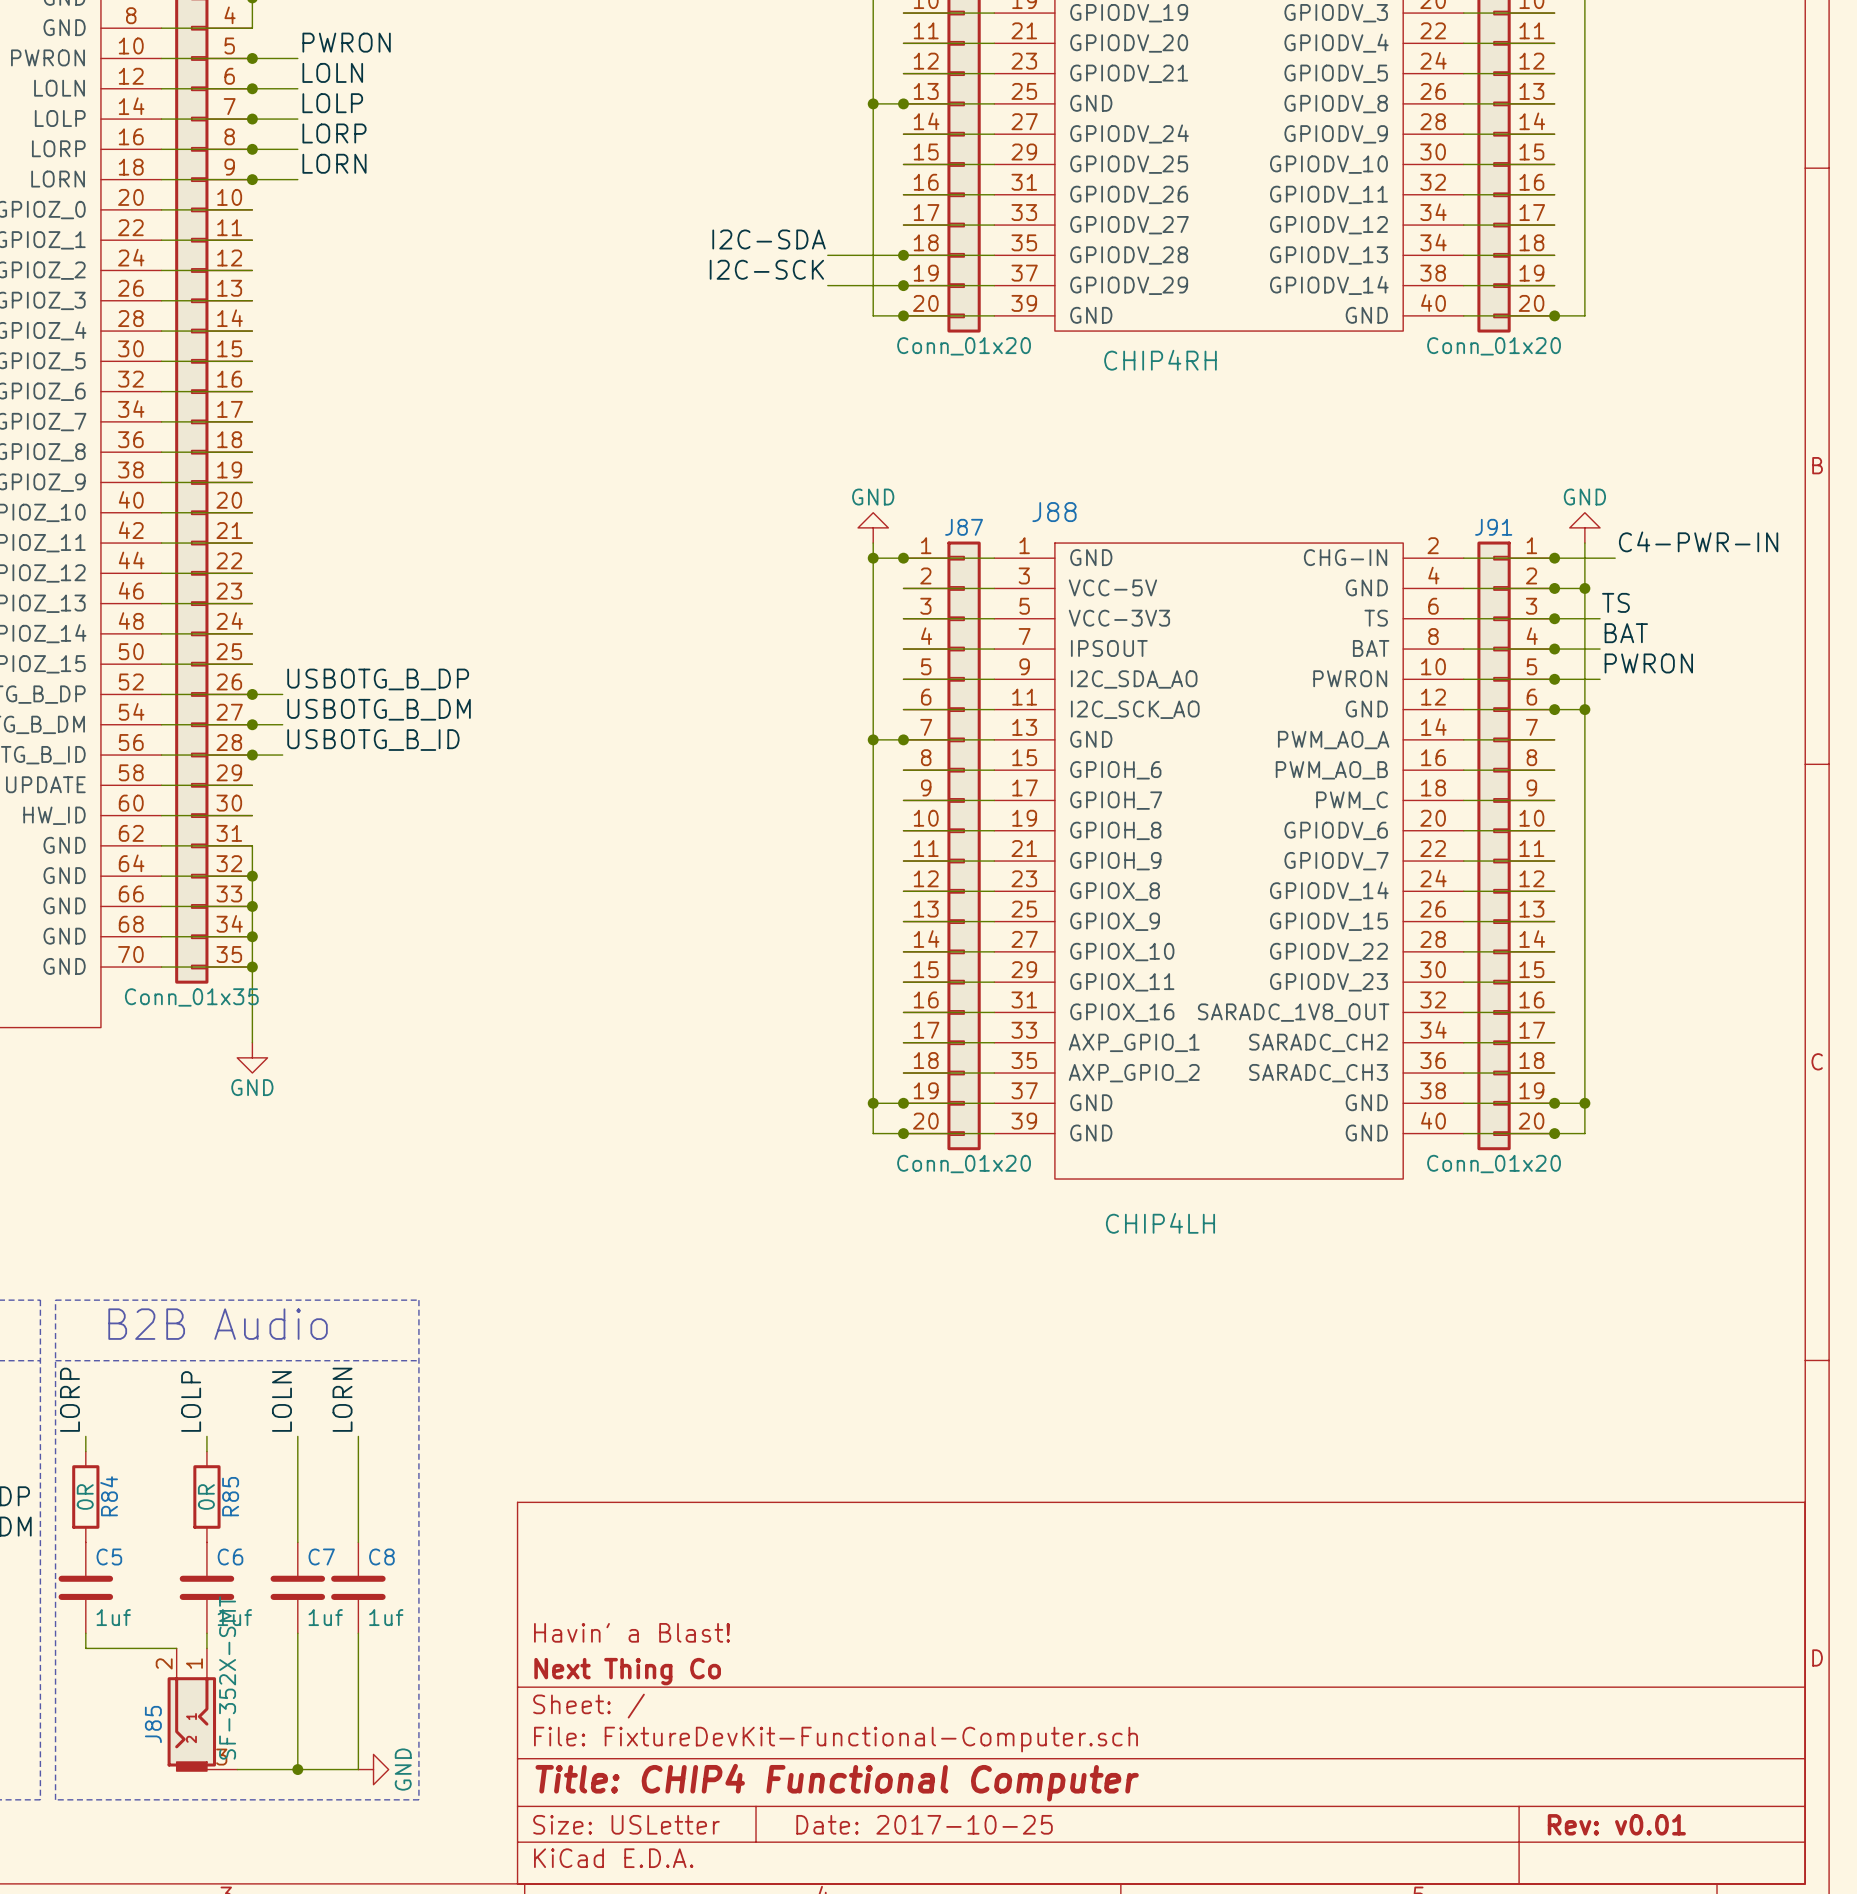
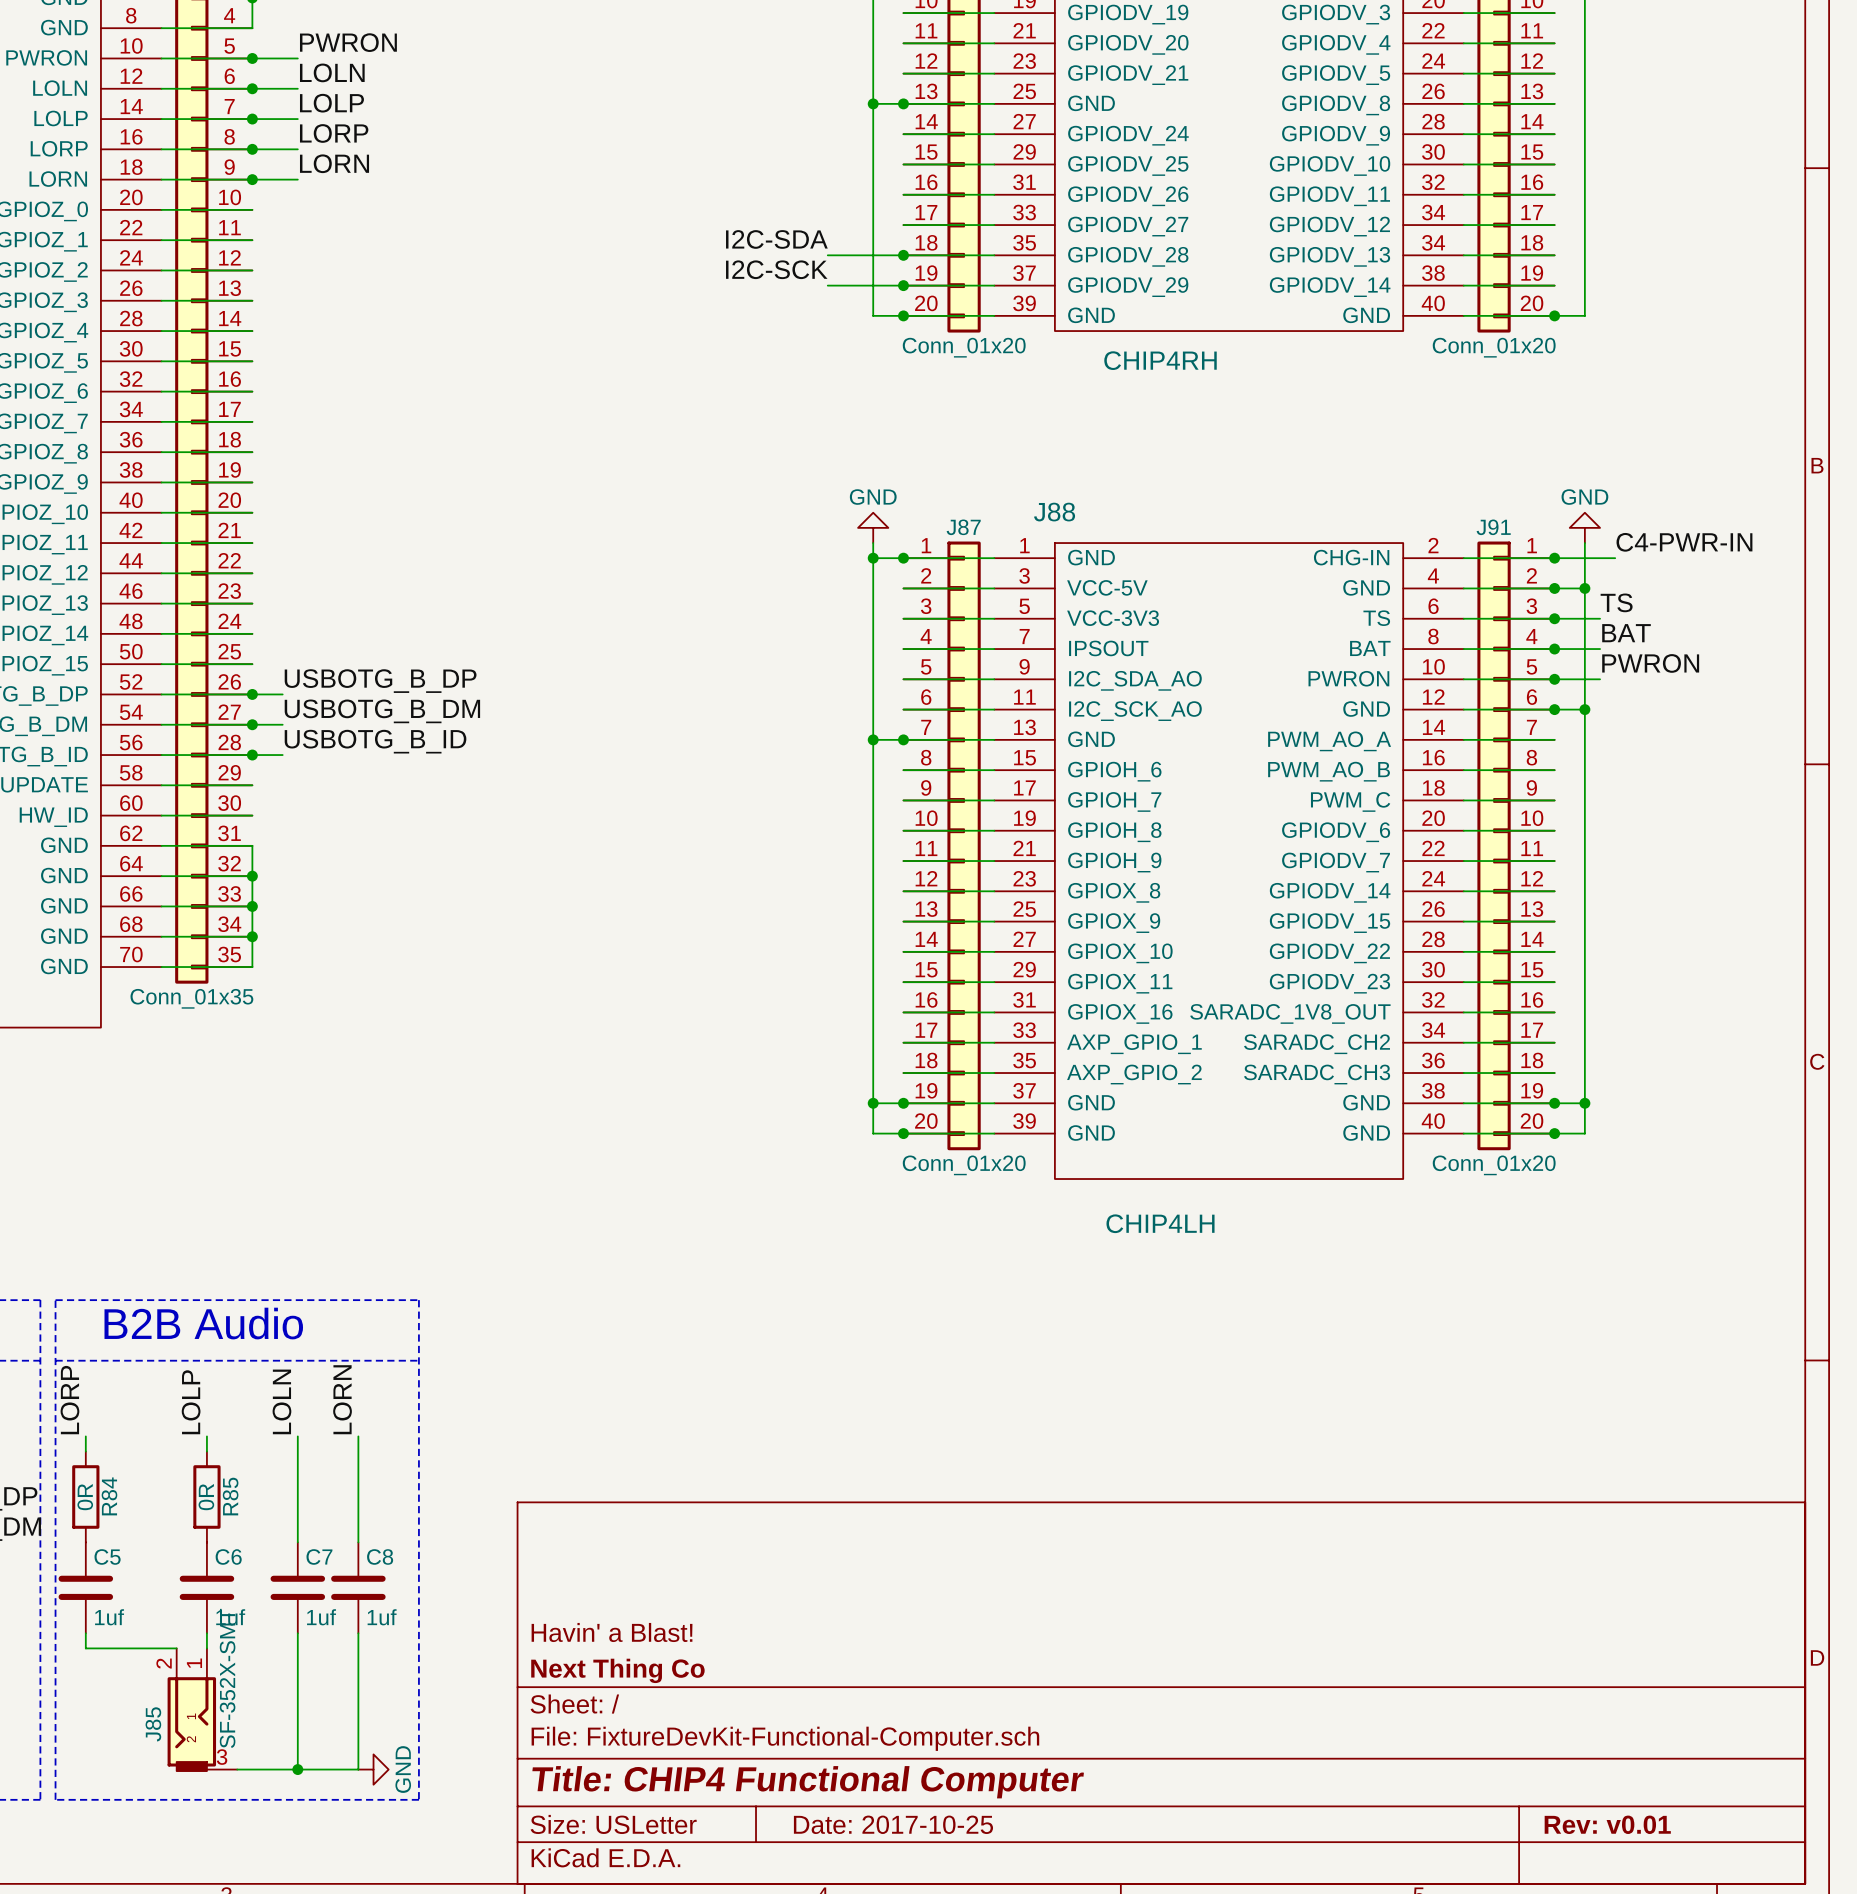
wire: (252, 967) (252, 1042) -> none
junction: (252, 967) -> none
power symbol: GND (252, 1057) -> none

